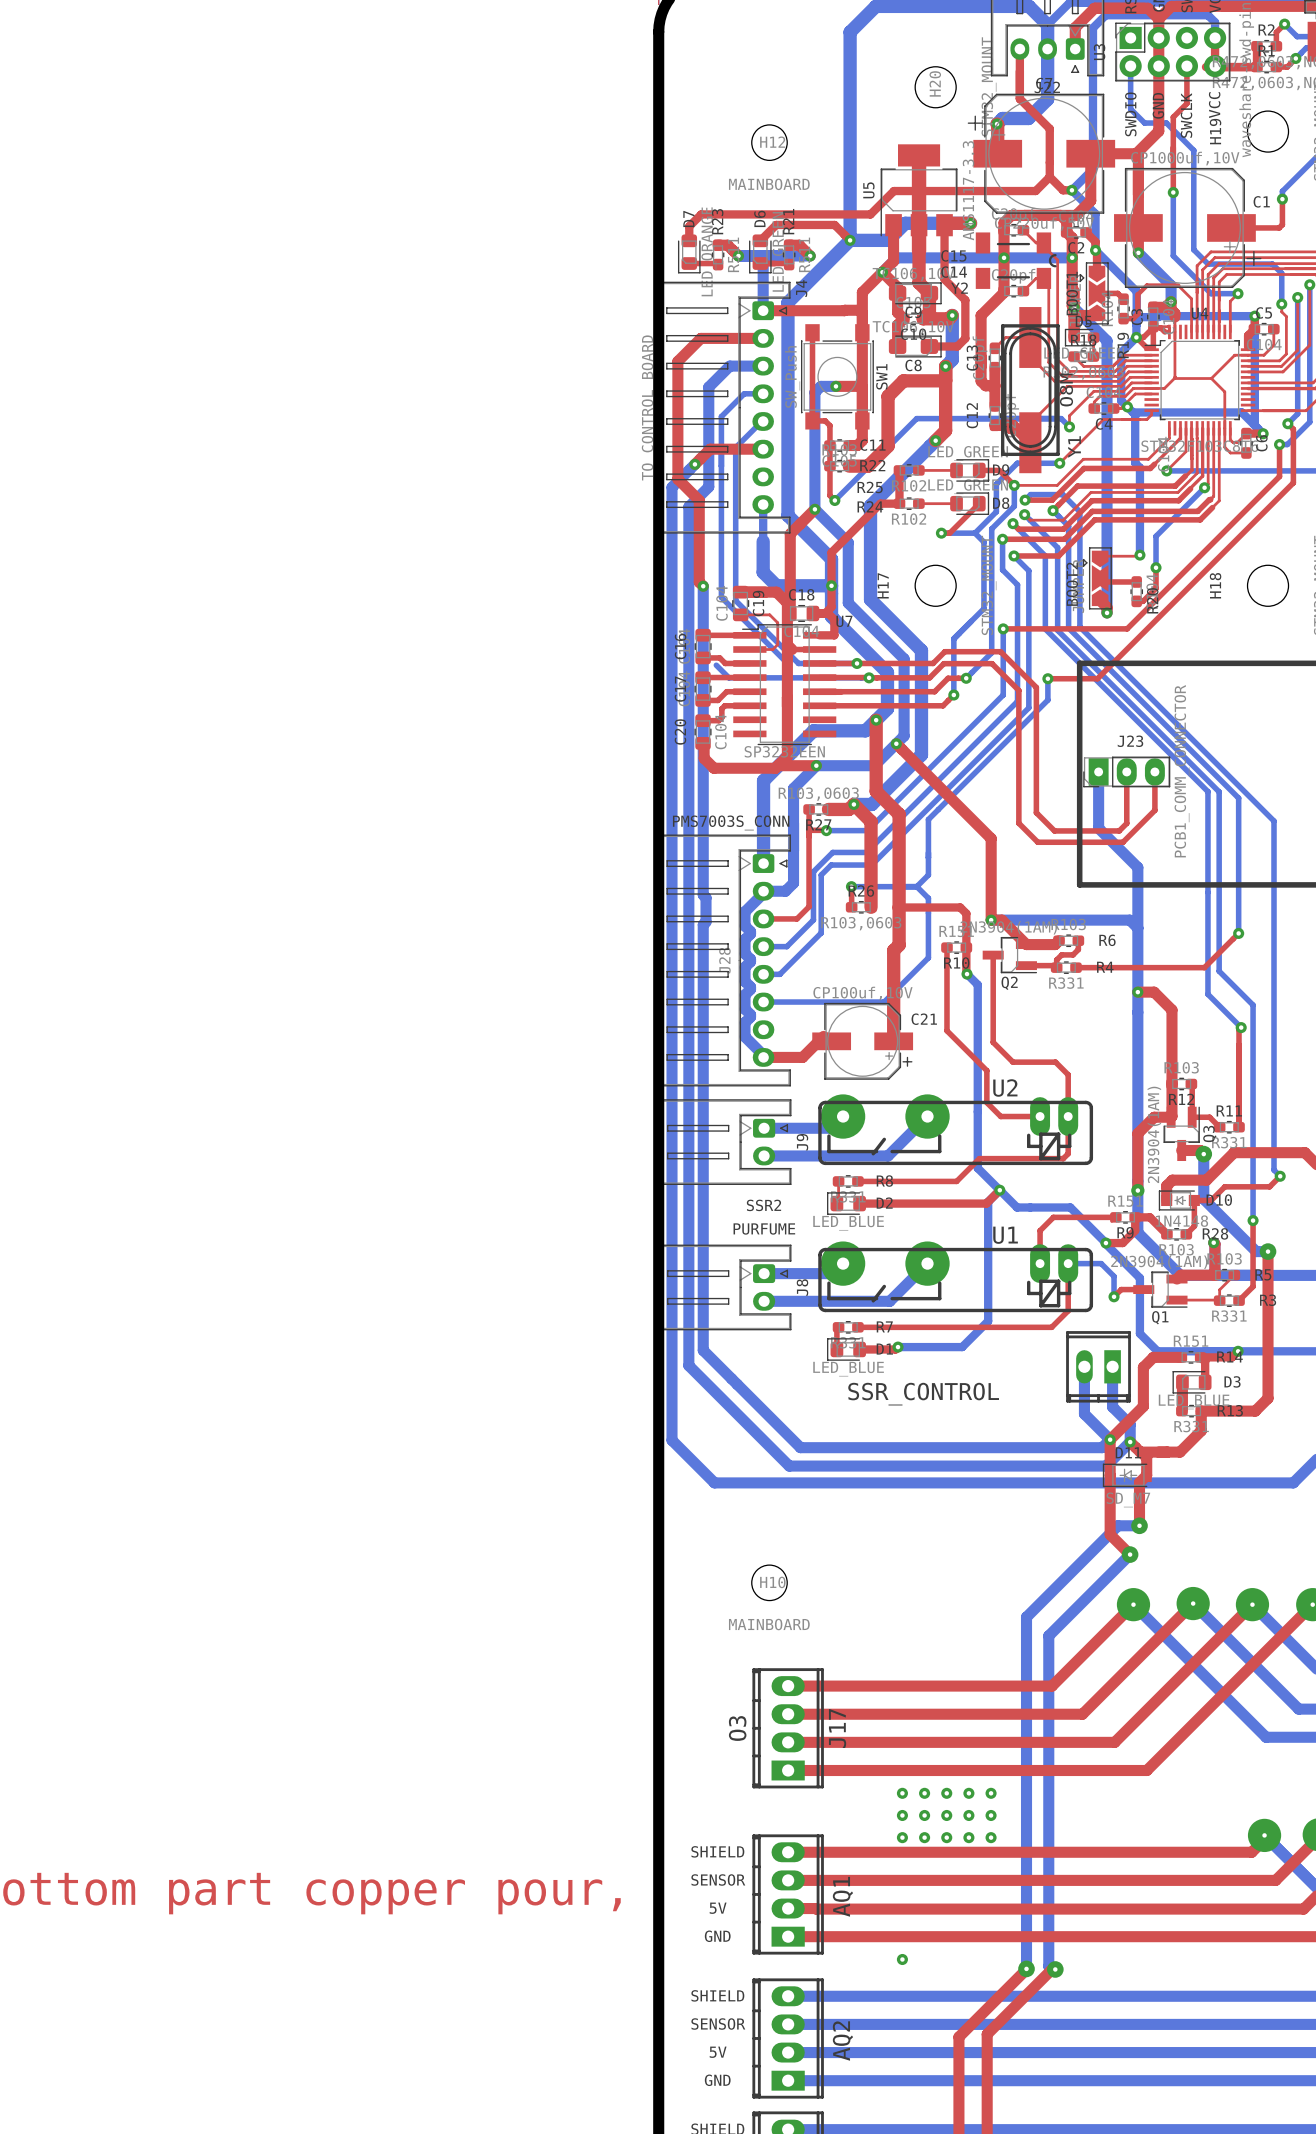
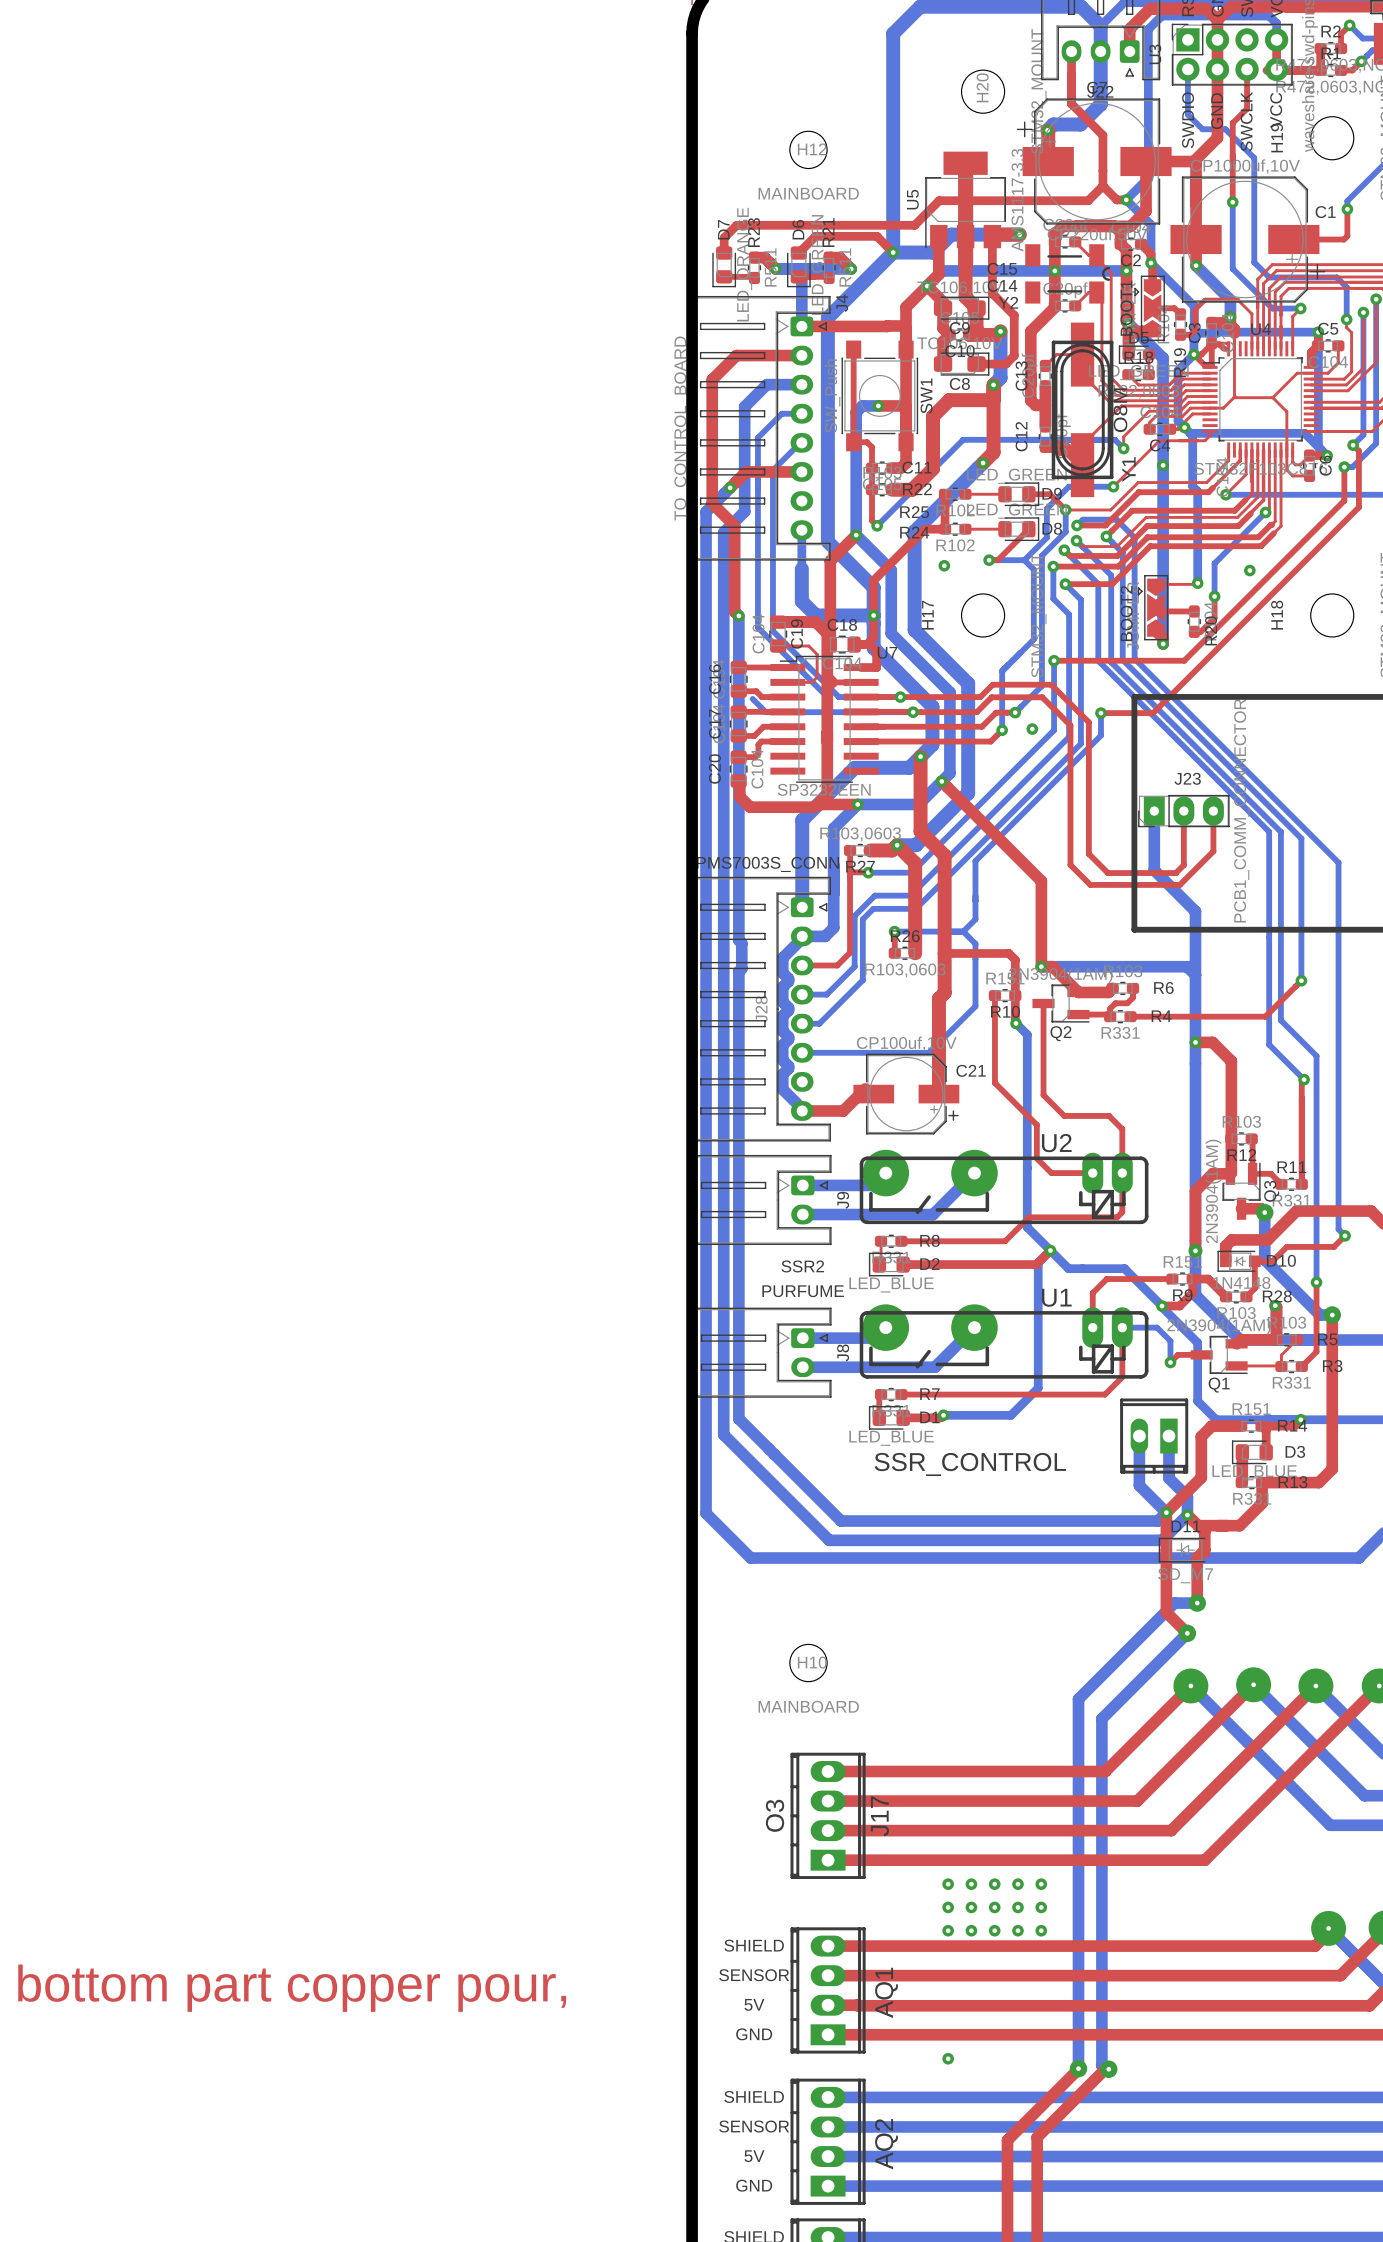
via: none -> (1163, 465)
via: none -> (944, 565)
via: none -> (1249, 570)
via: none -> (1032, 729)

